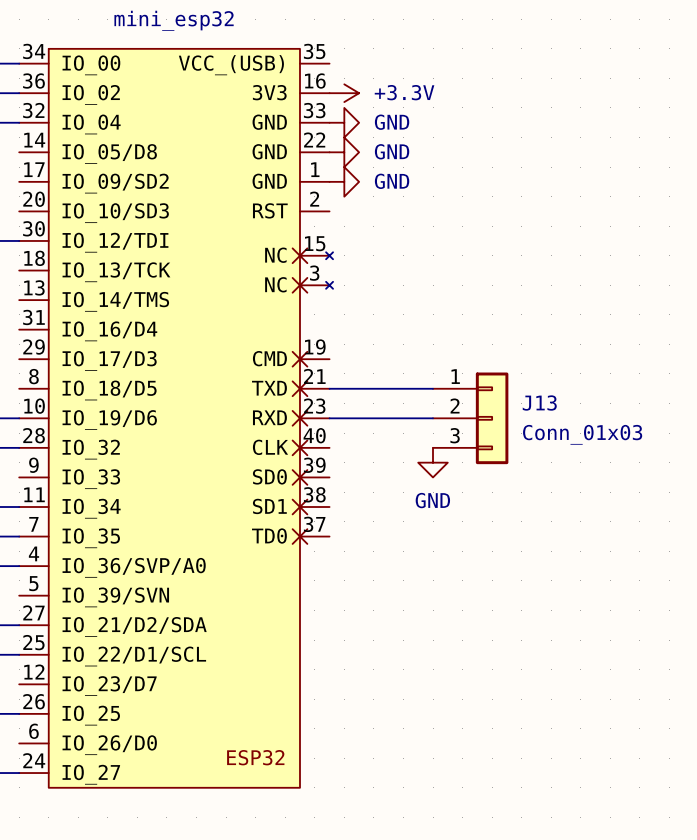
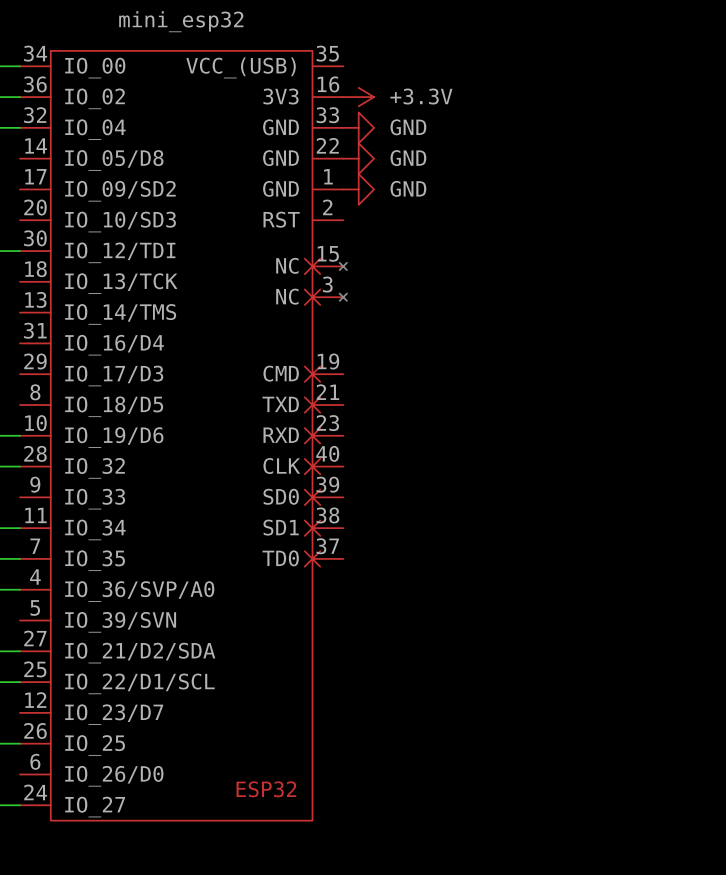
wire: (329, 388) (433, 388) -> none
wire: (329, 418) (433, 418) -> none
J13: Conn_01x03 (470, 418) -> none
power symbol: GND (433, 462) -> none

